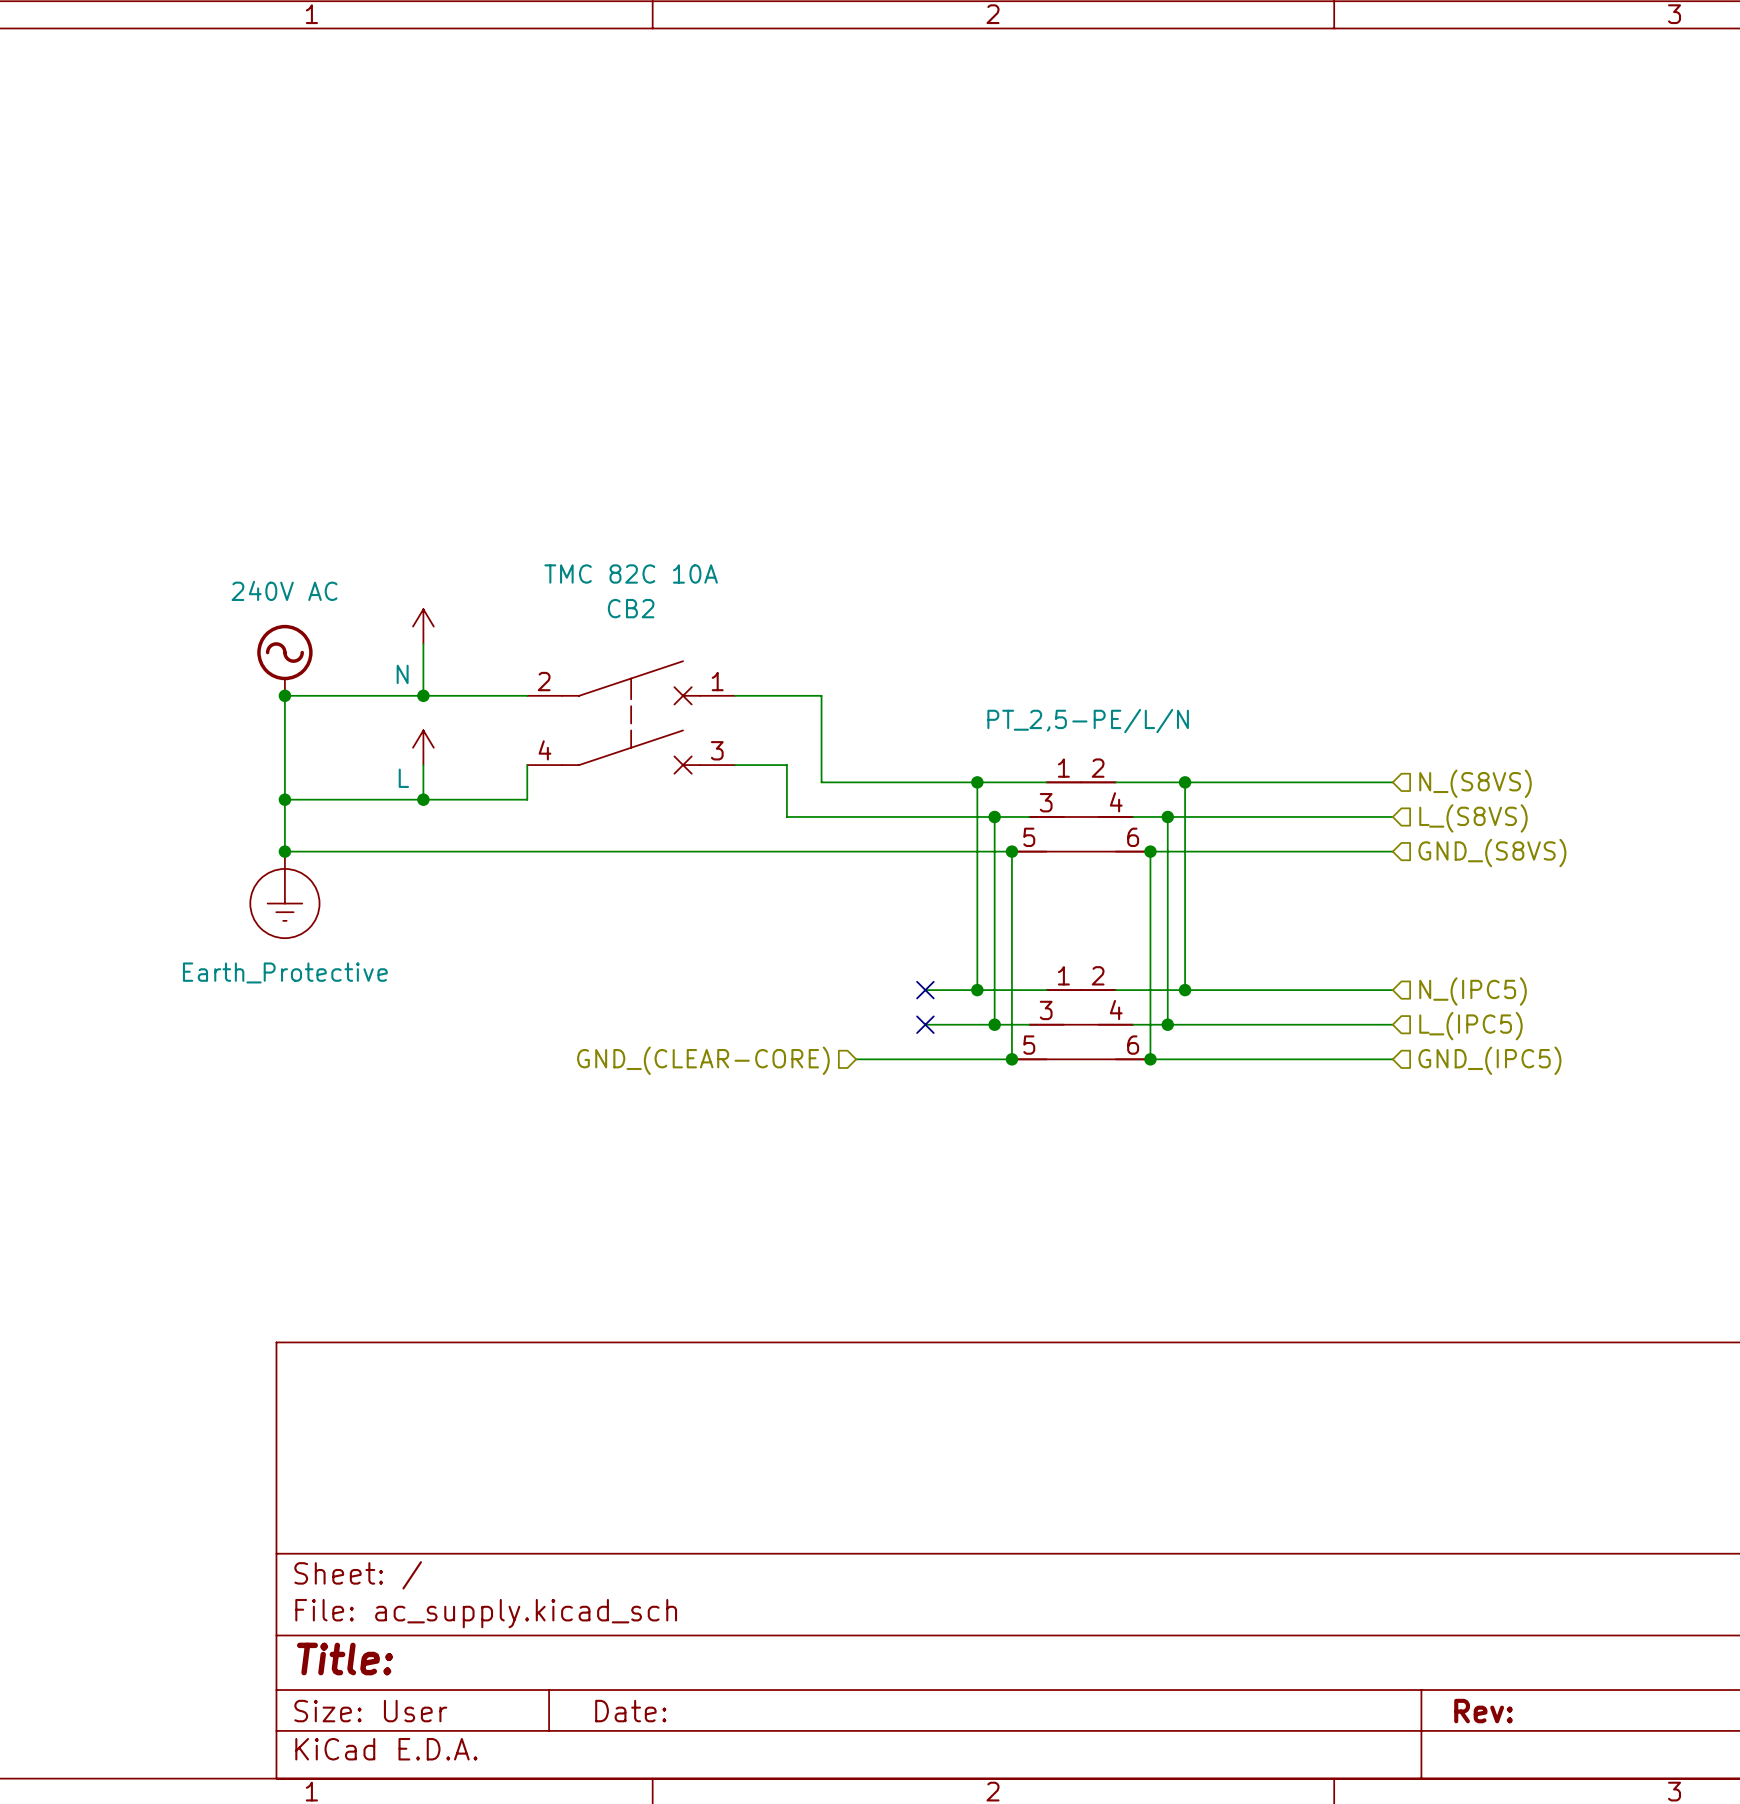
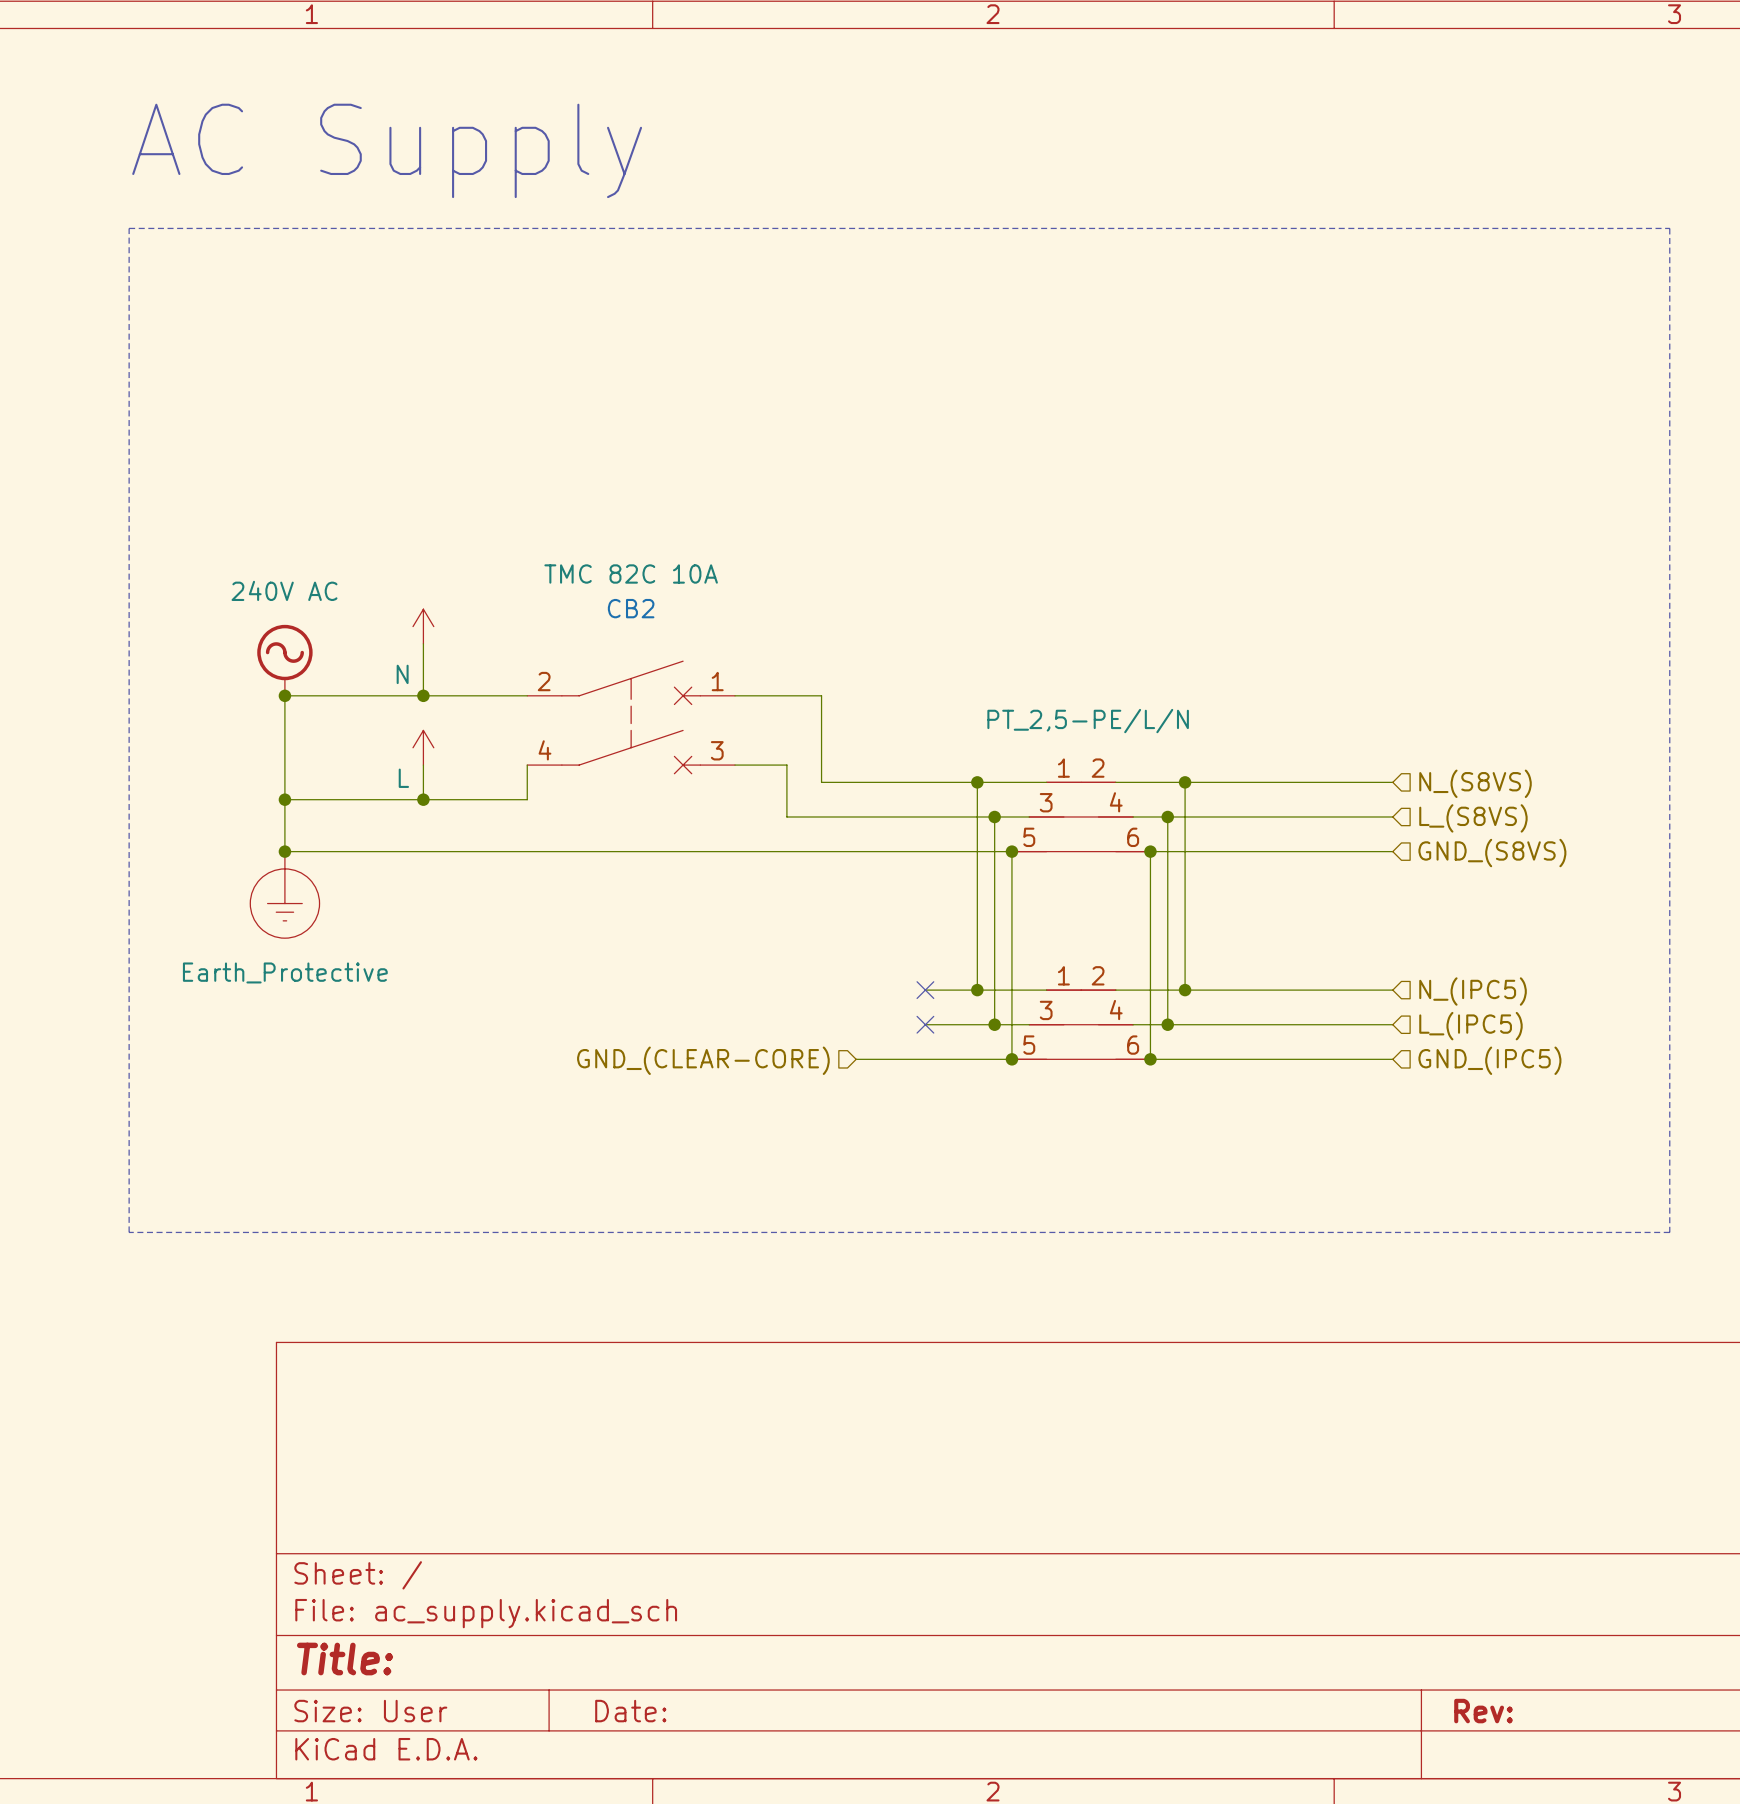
text: none -> AC Supply (387, 150)
line: none -> (129, 228) (1669, 228) (1669, 1232) (129, 1232) (129, 228)

